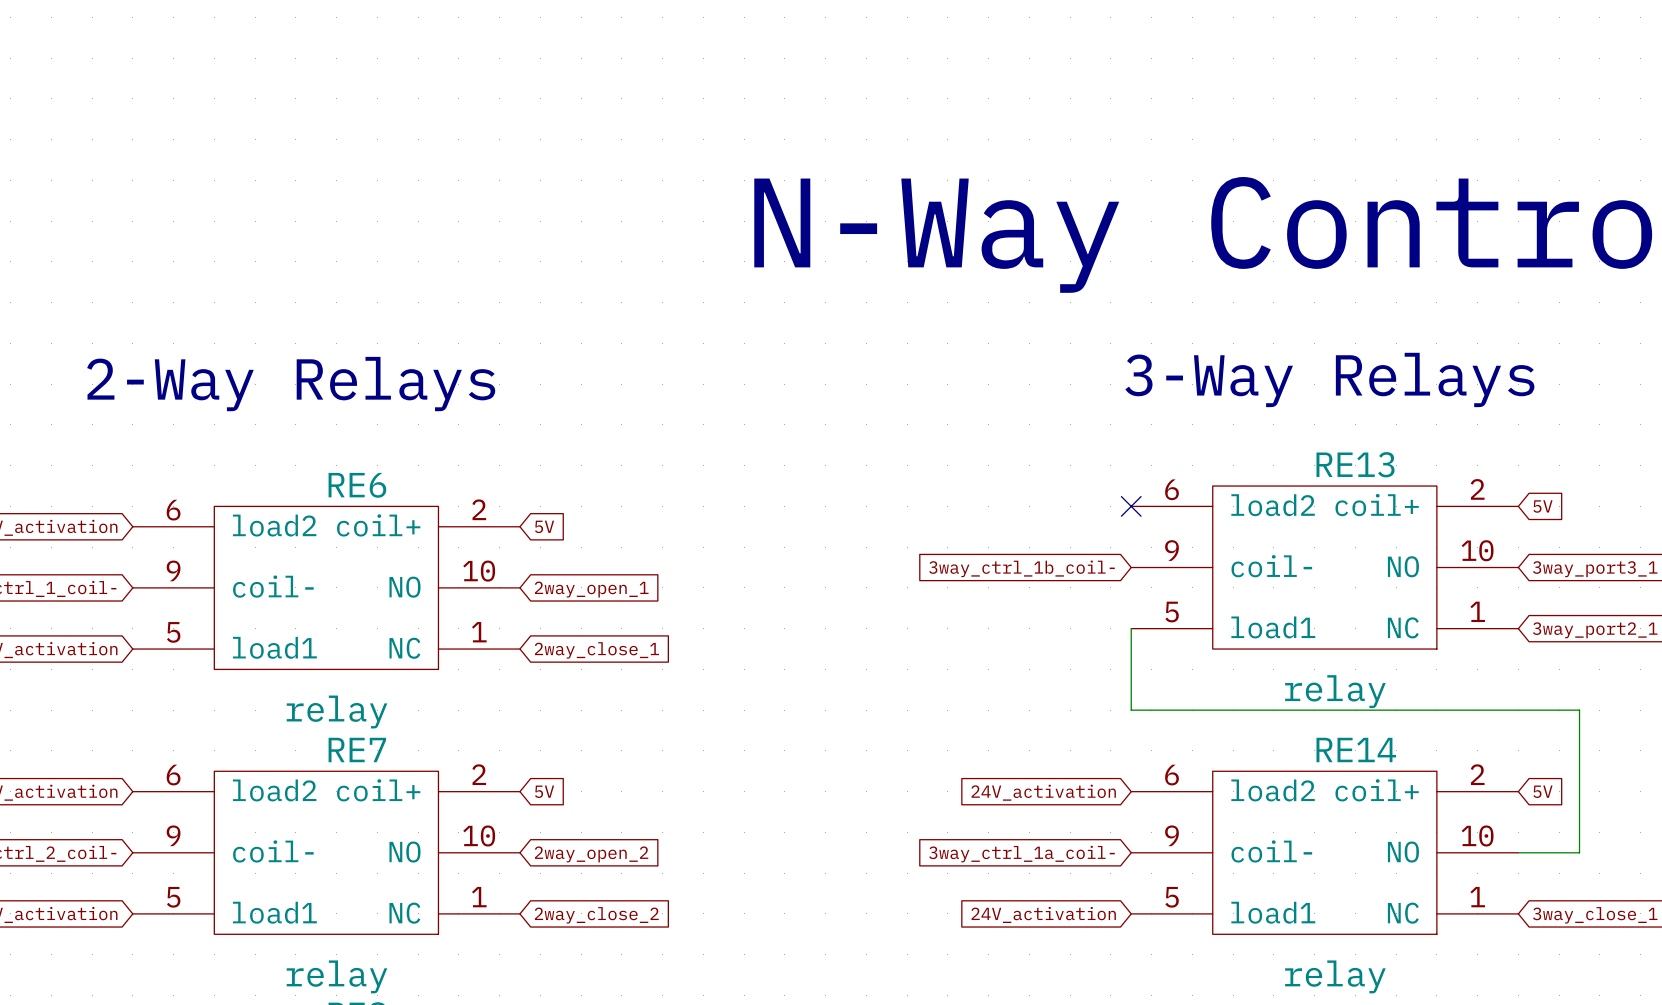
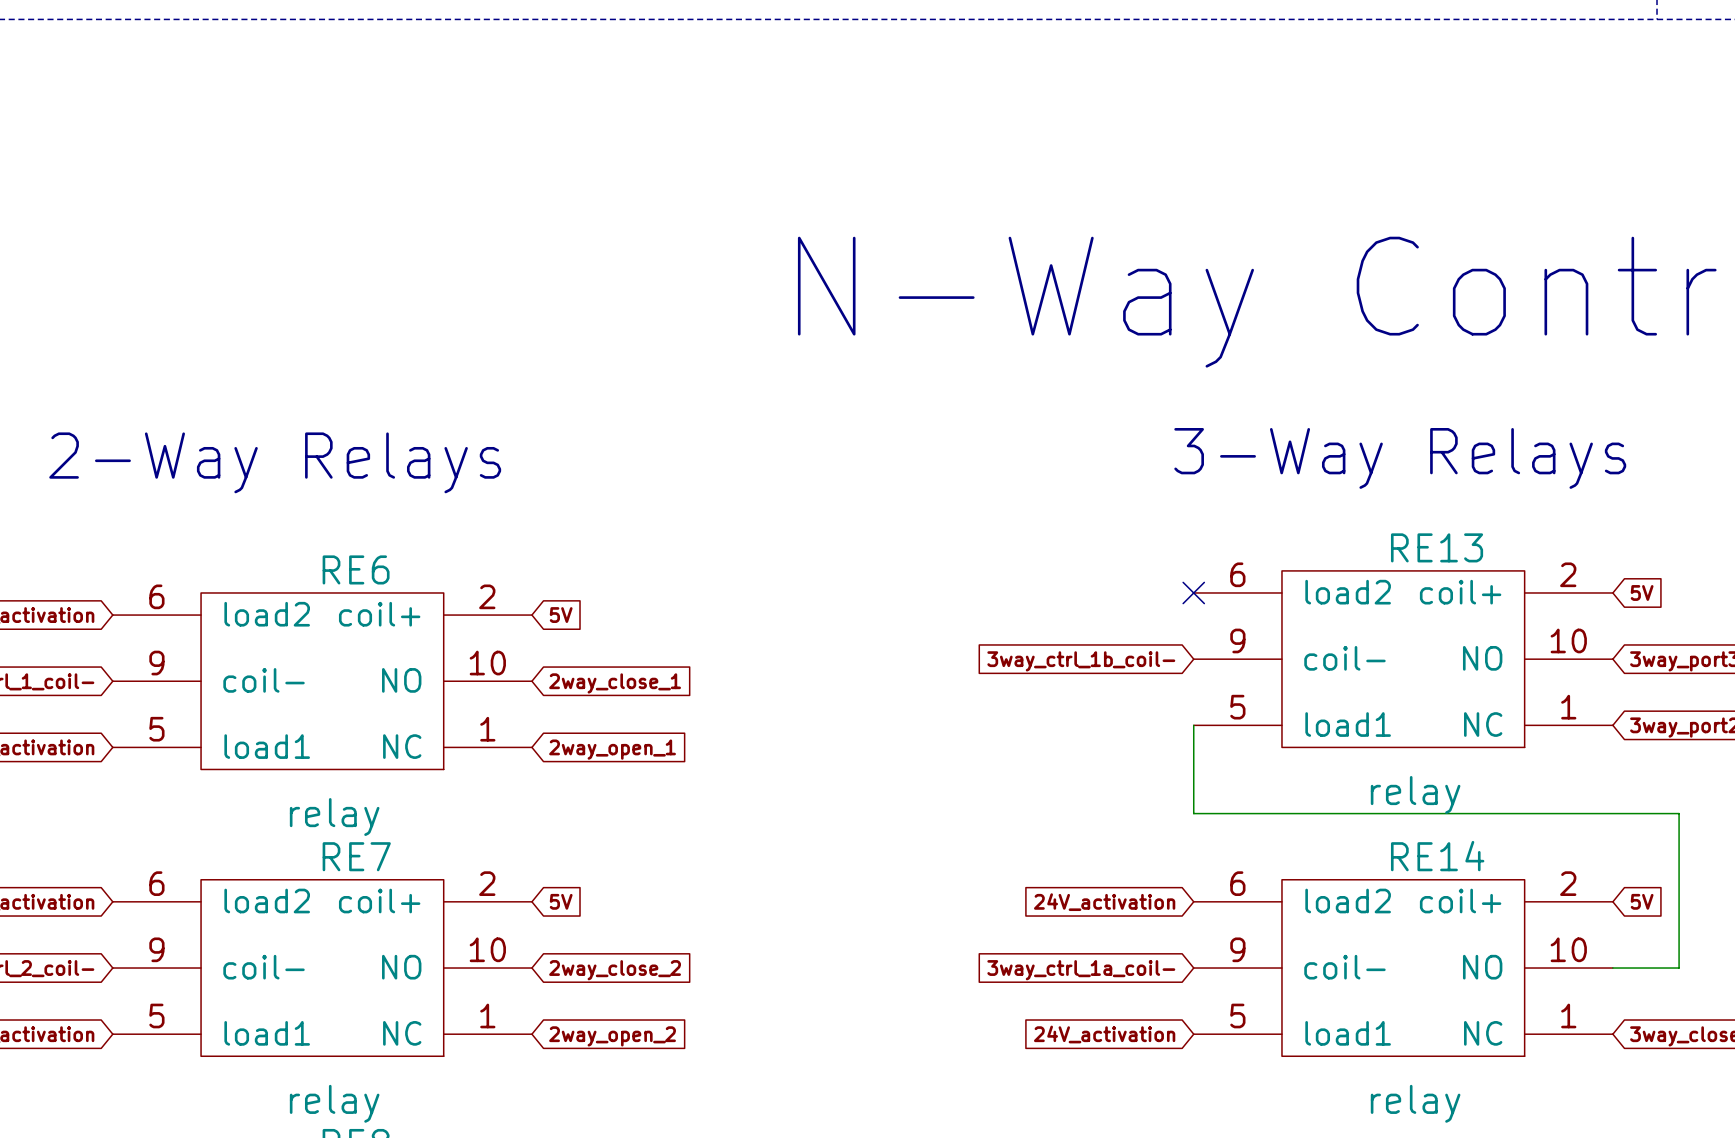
global label: 2way_open_1 (591, 589) -> 2way_close_1 (615, 683)
global label: 2way_close_1 (596, 650) -> 2way_open_1 (612, 749)
global label: 2way_open_2 (591, 854) -> 2way_close_2 (615, 970)
global label: 2way_close_2 (596, 915) -> 2way_open_2 (612, 1036)

